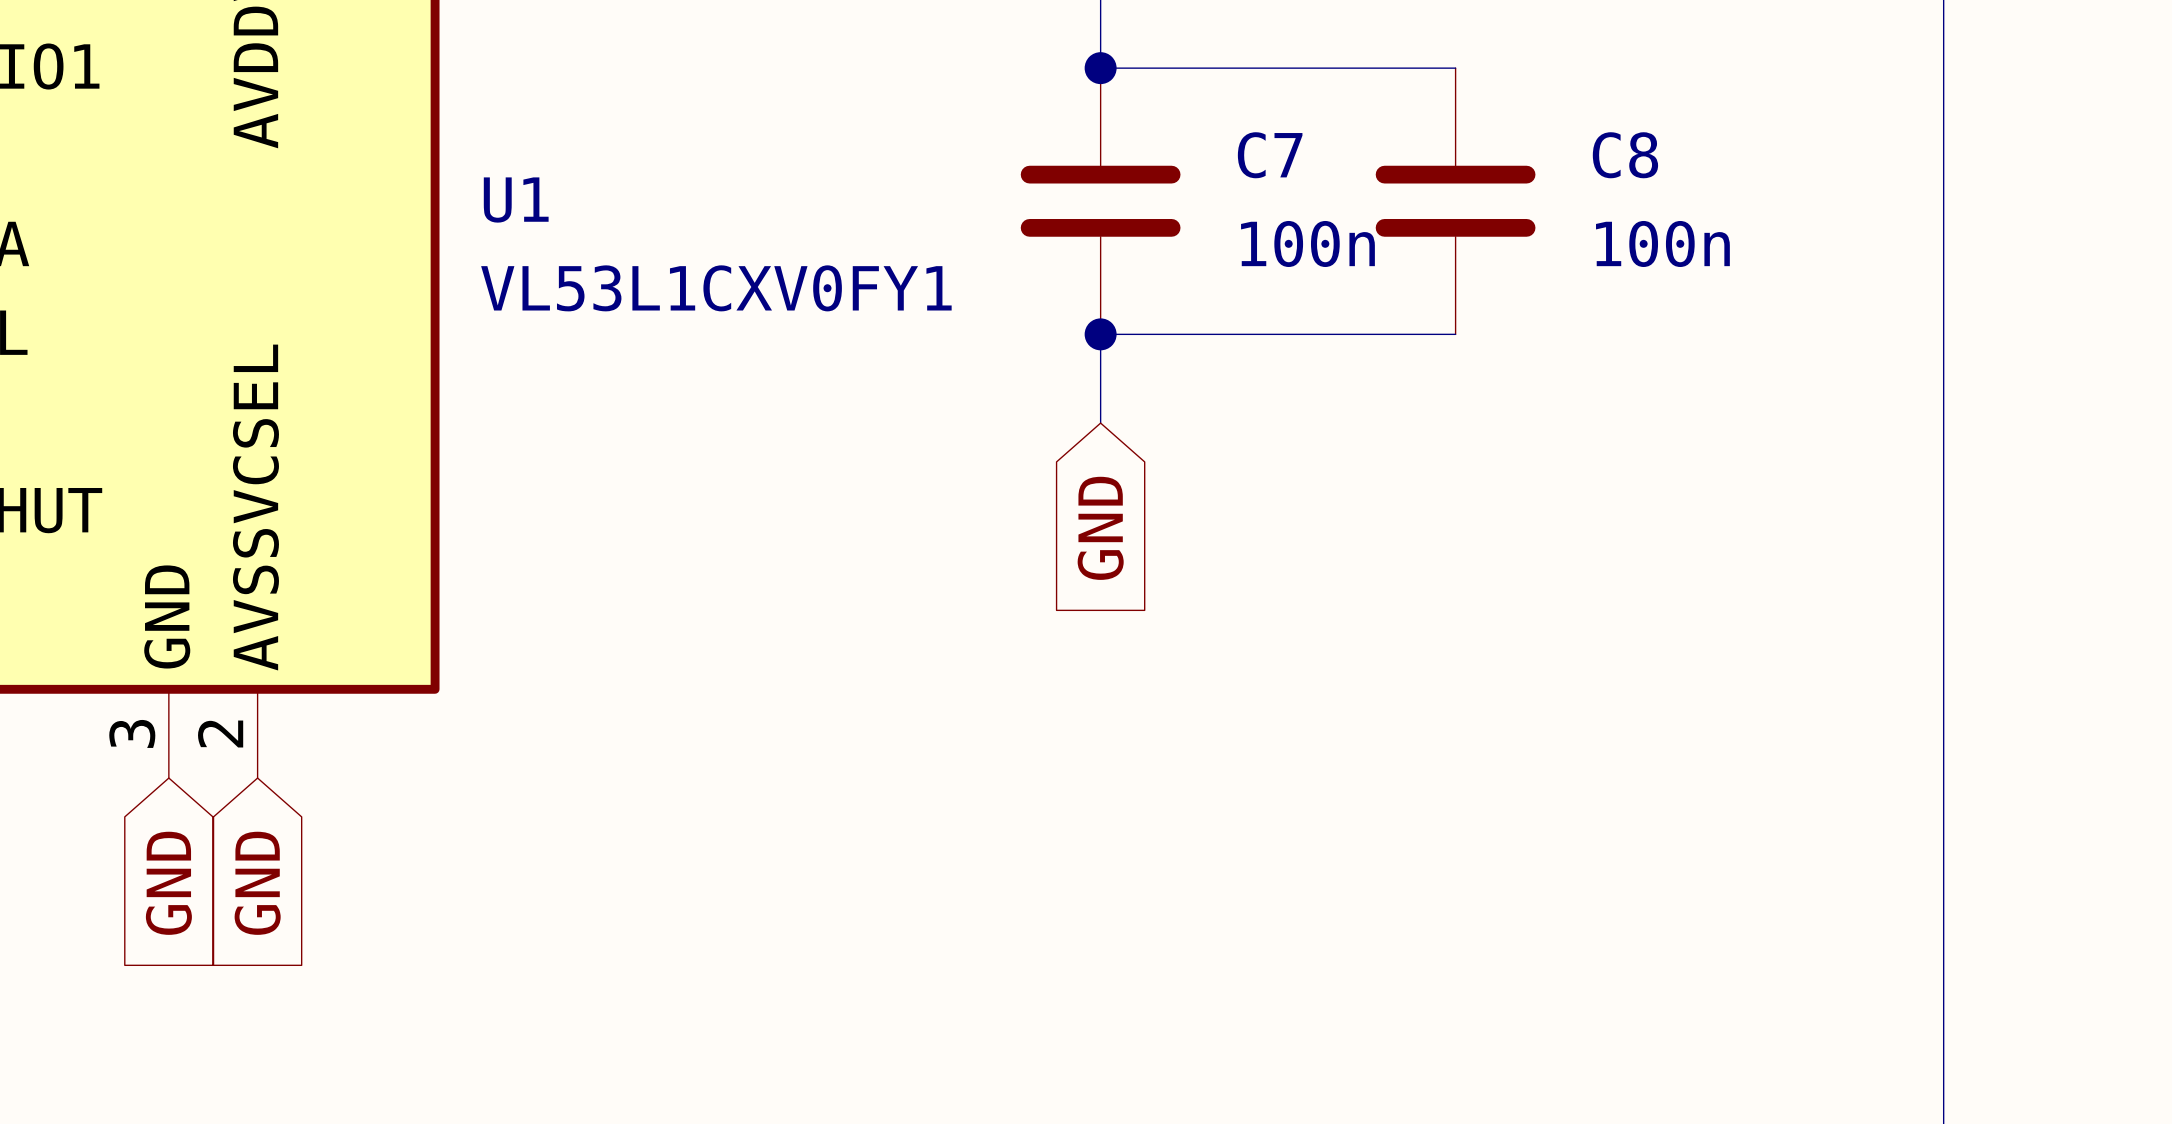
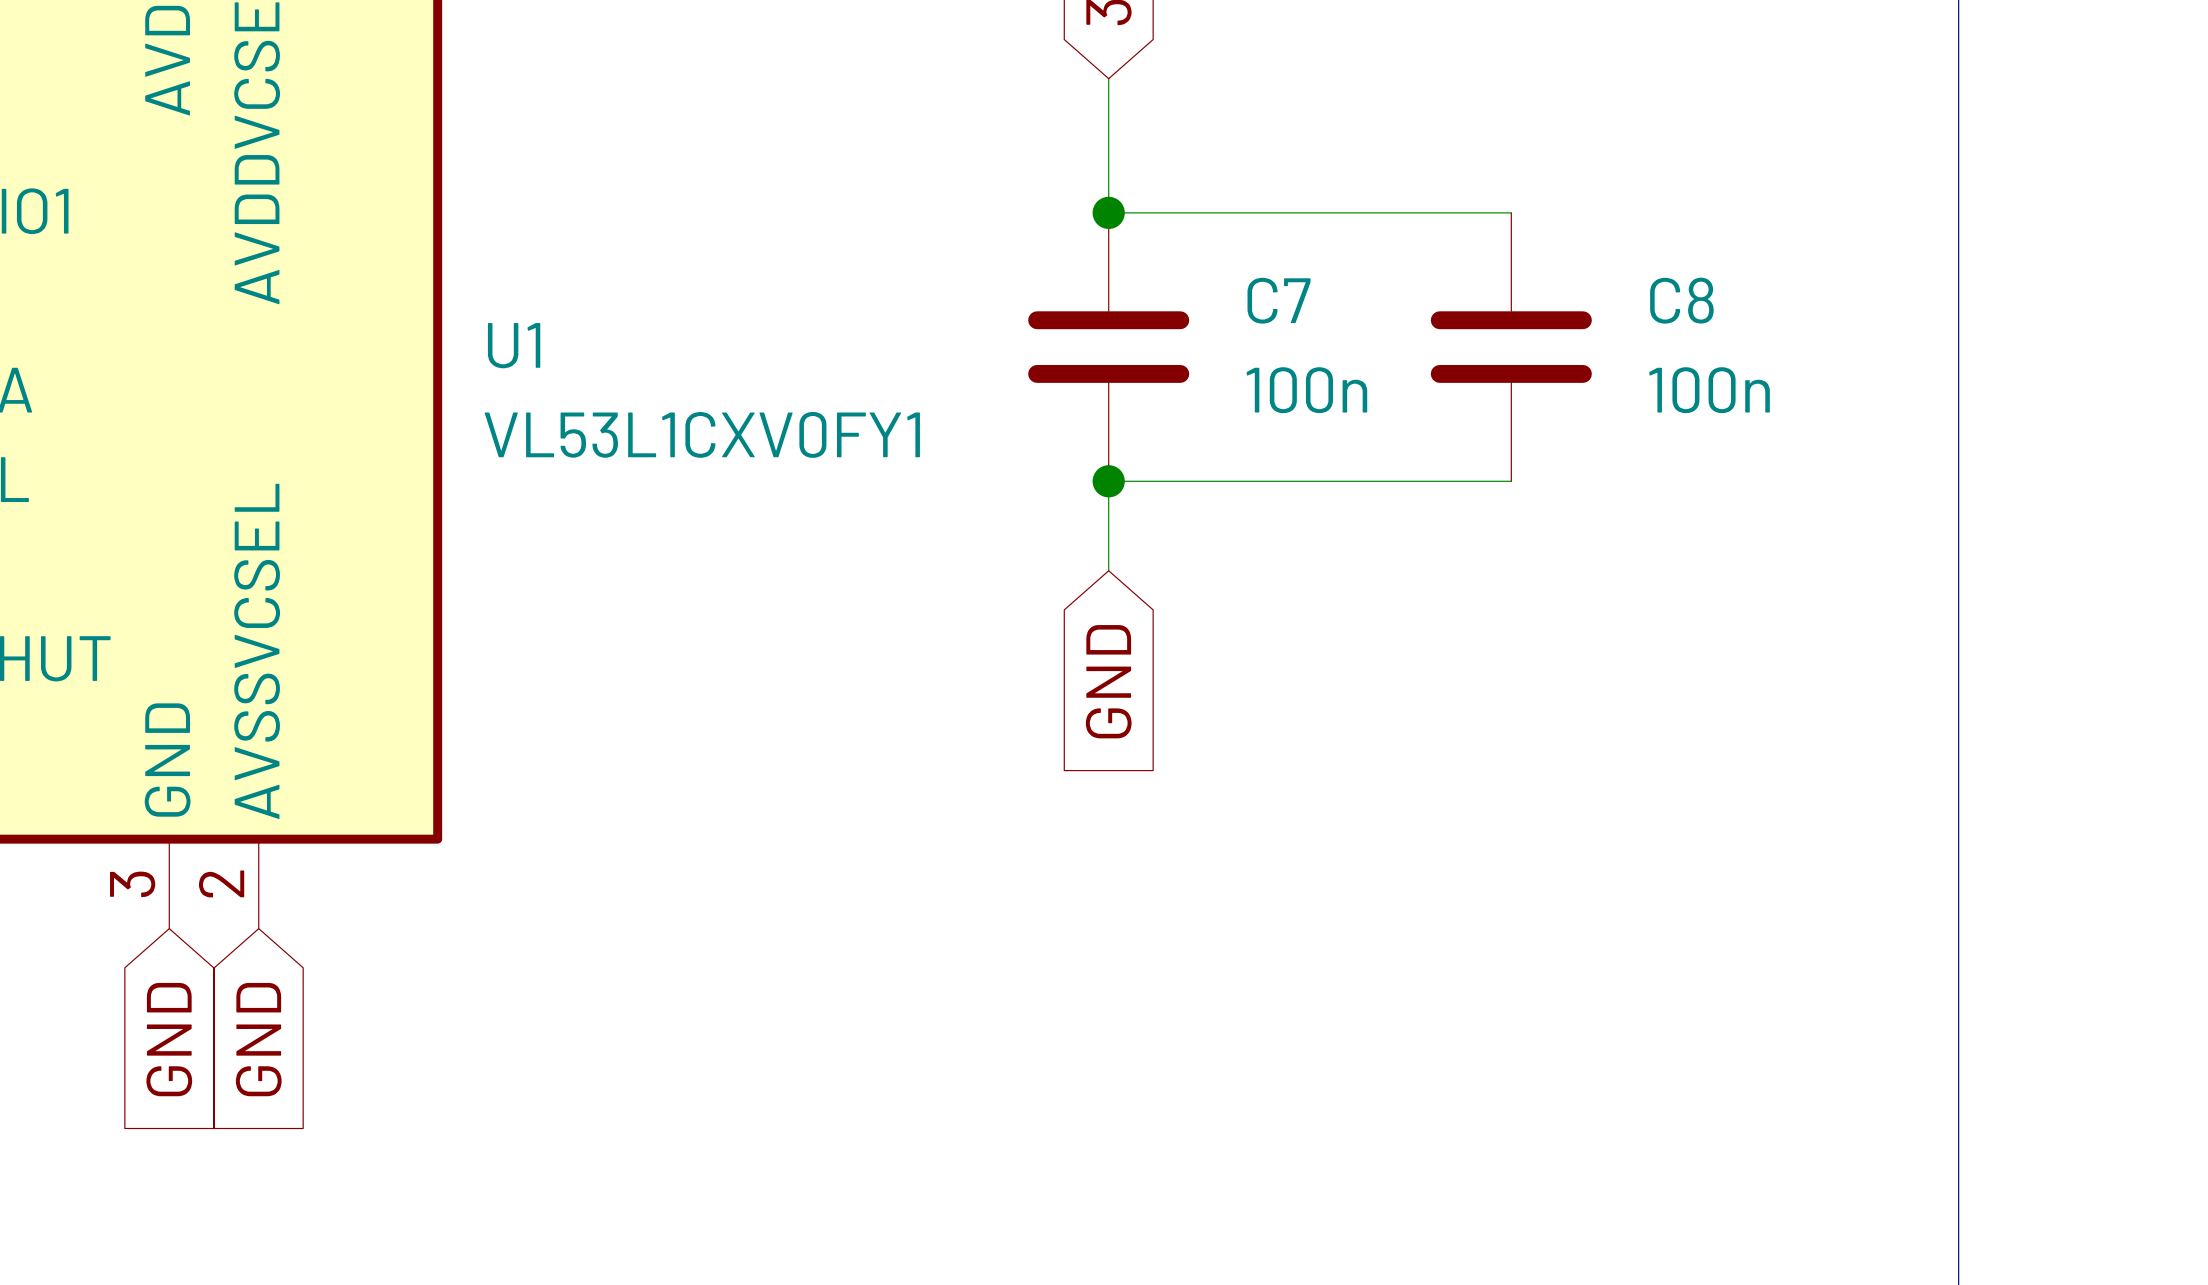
wire: none -> (1466, 212) (1511, 212)
C8 position: (1455, 201) -> (1511, 347)
wire: none -> (1466, 481) (1511, 481)

